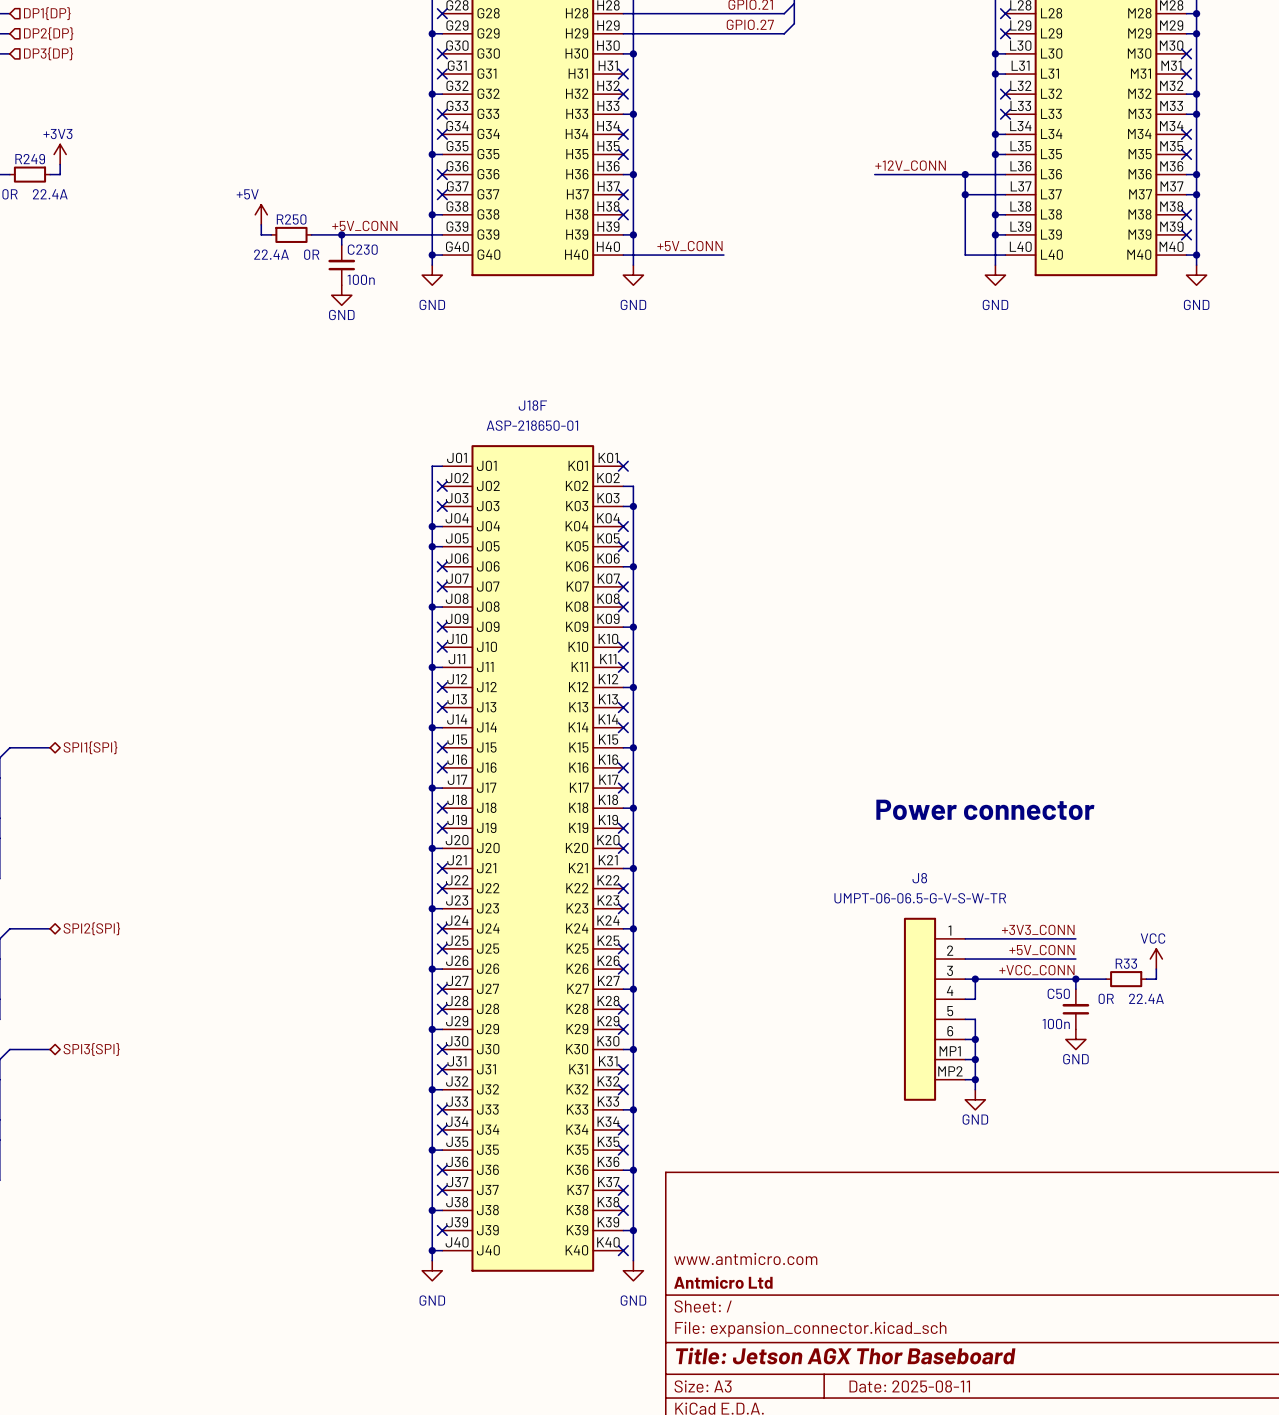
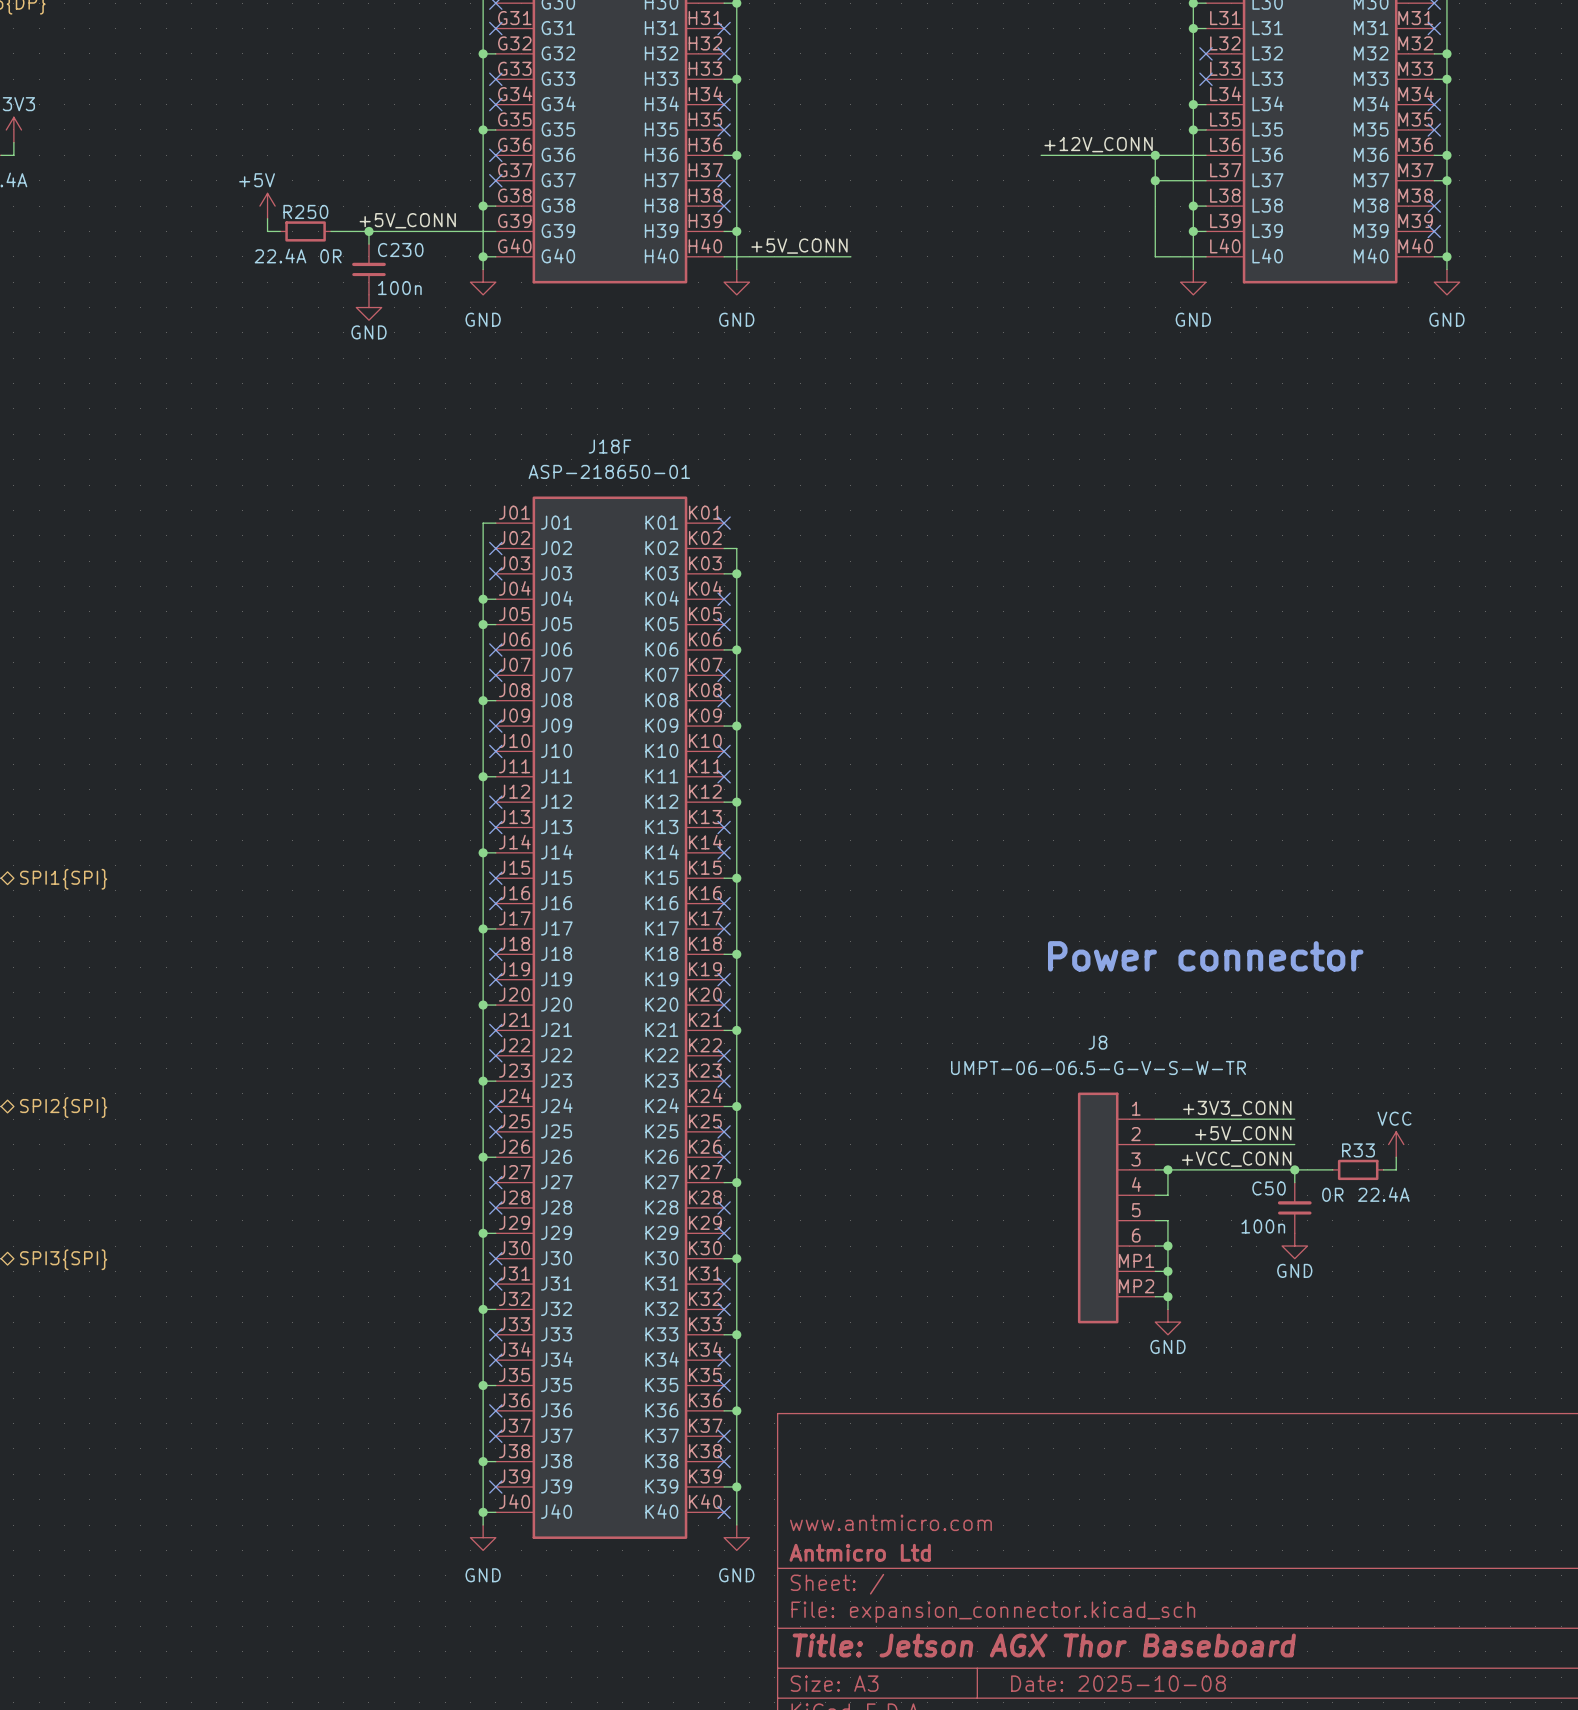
title block: Date: 2025-08-11 (909, 1386) -> Date: 2025-10-08 (1118, 1683)

